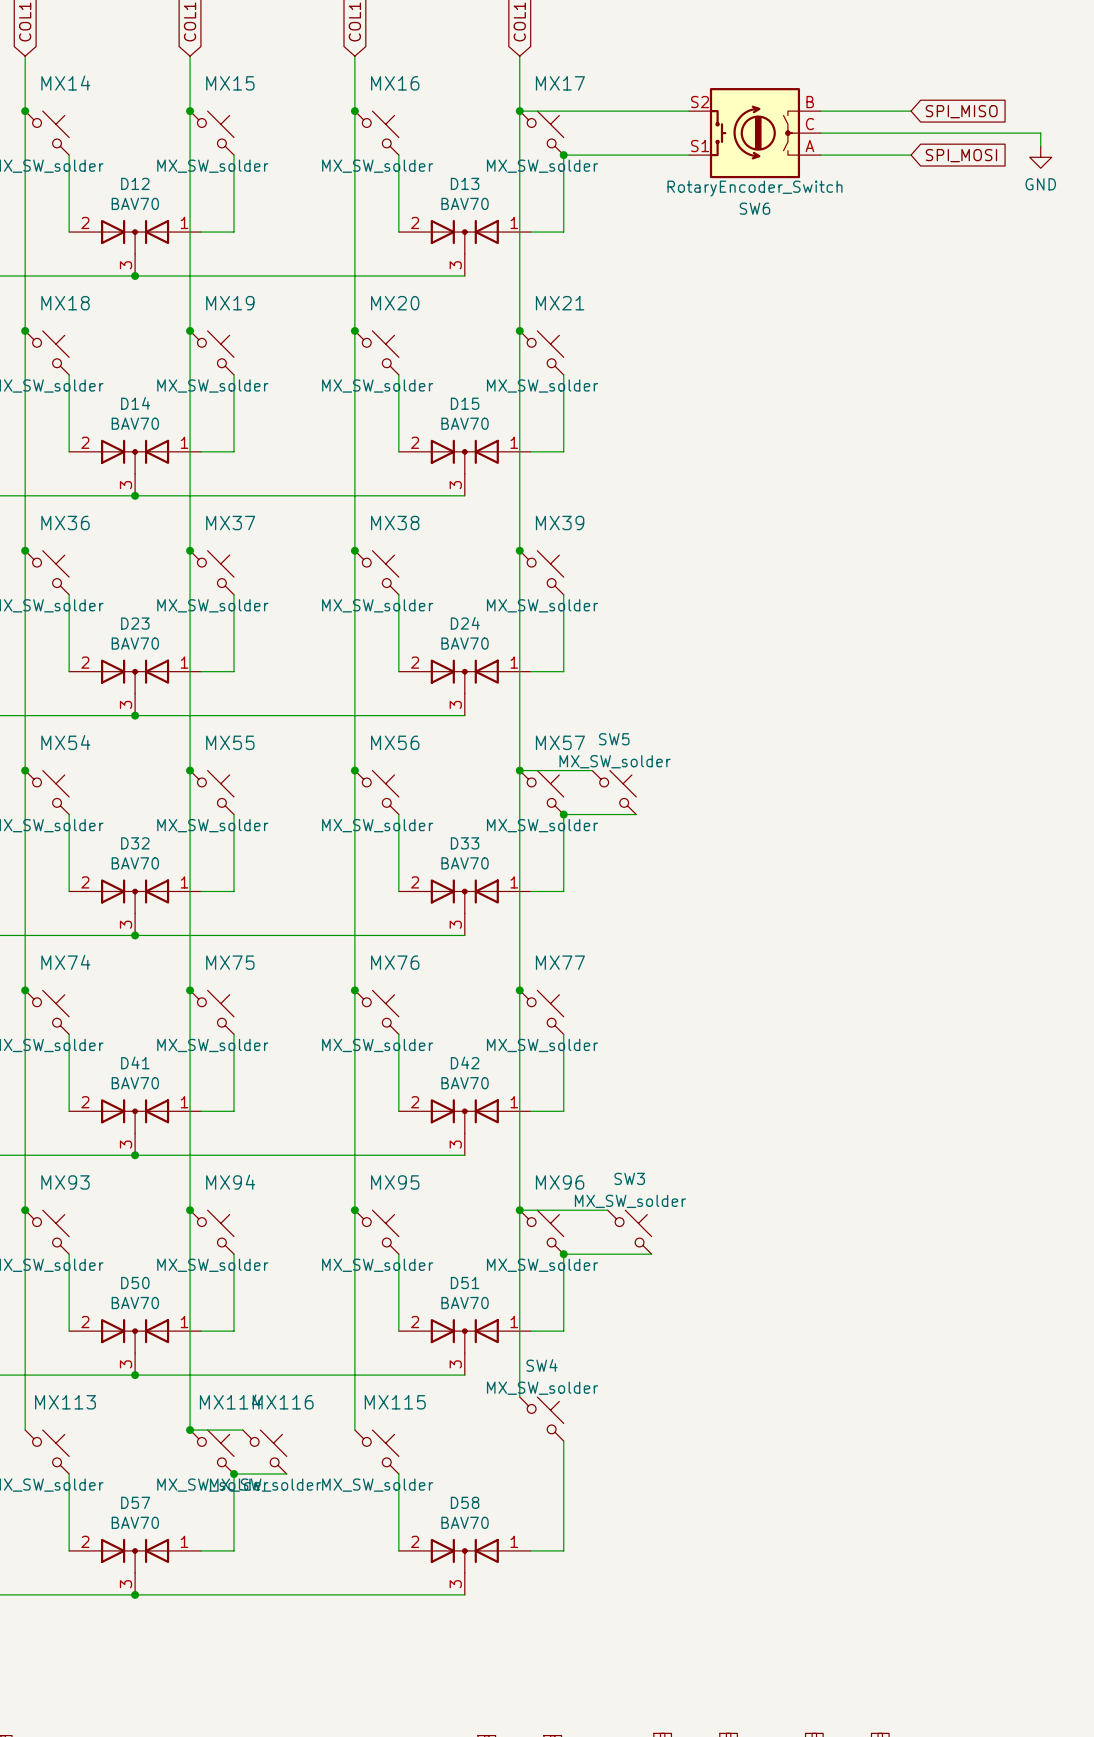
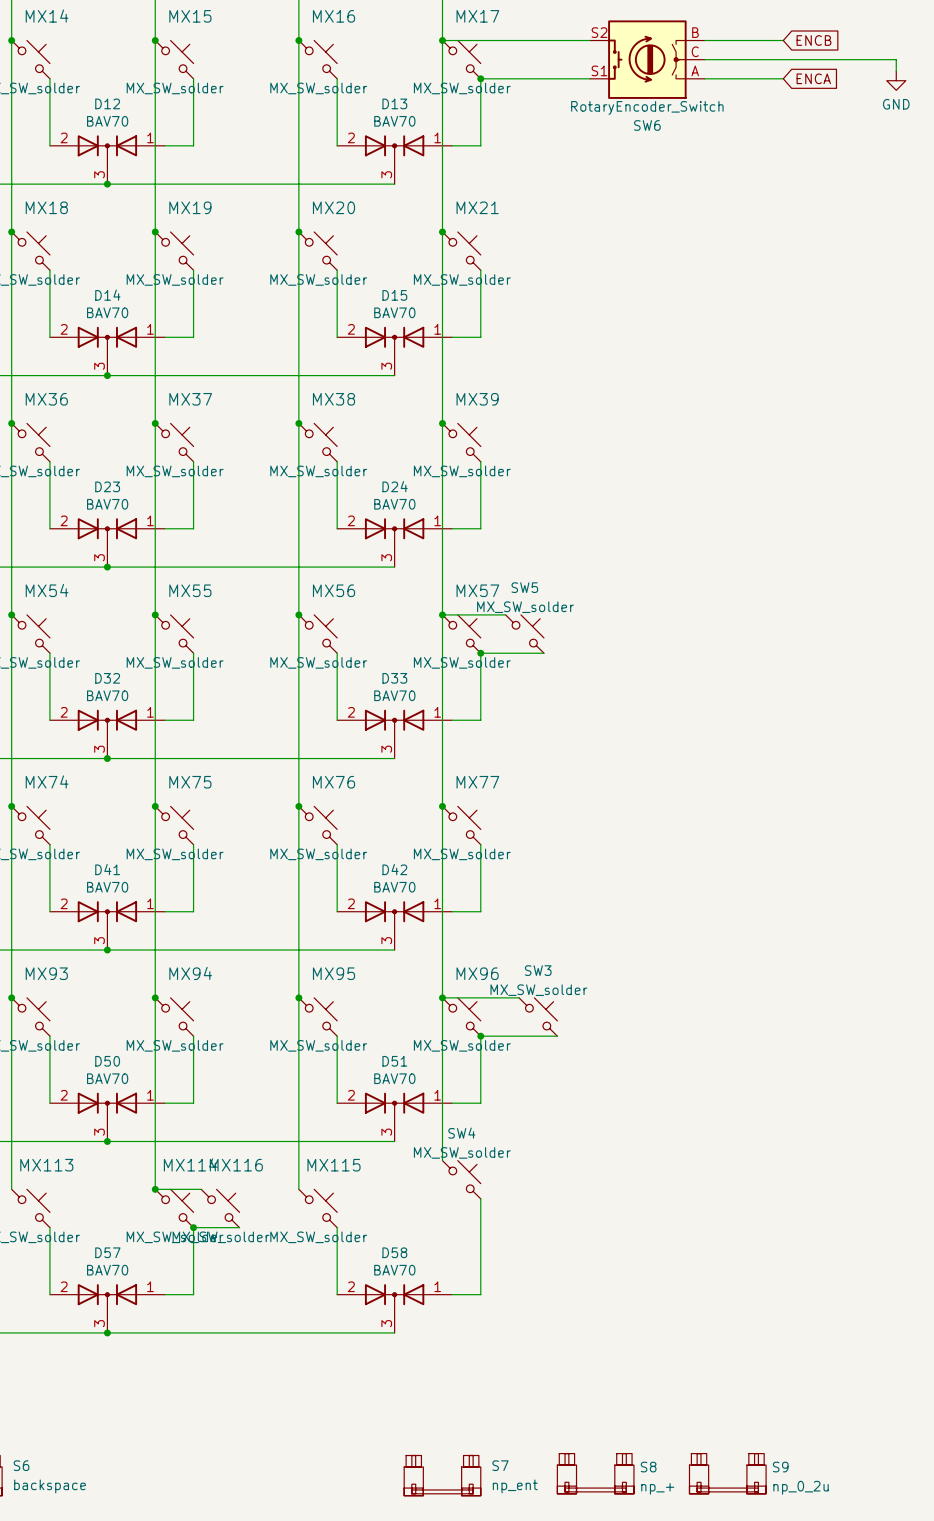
global label: SPI_MISO (961, 111) -> ENCB (813, 40)
global label: SPI_MOSI (961, 155) -> ENCA (813, 78)

